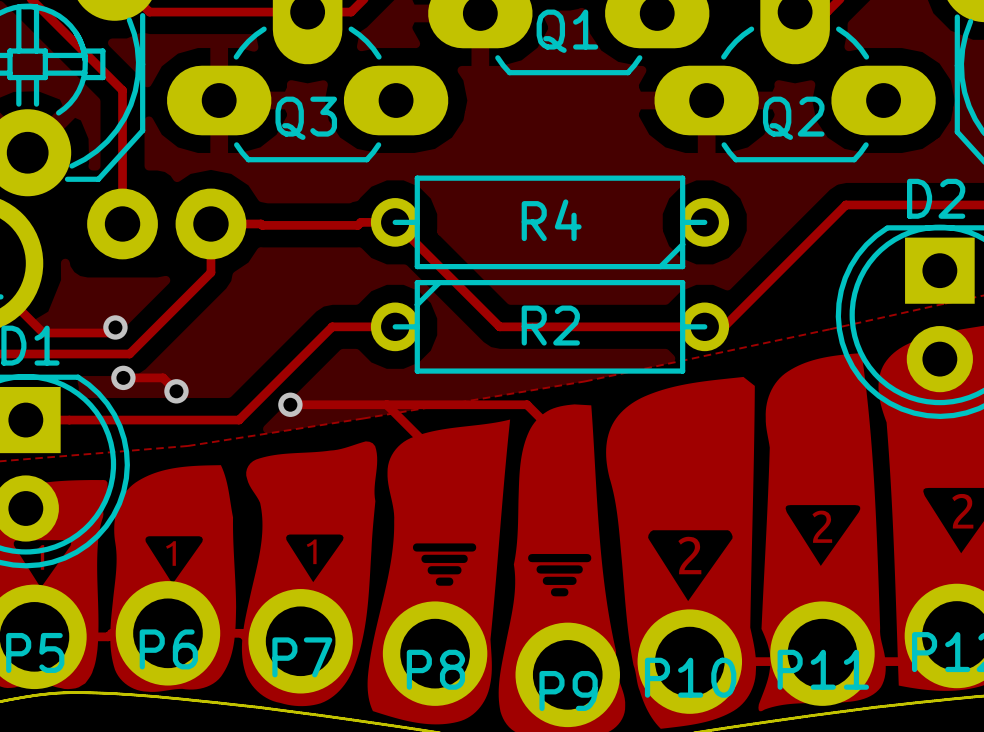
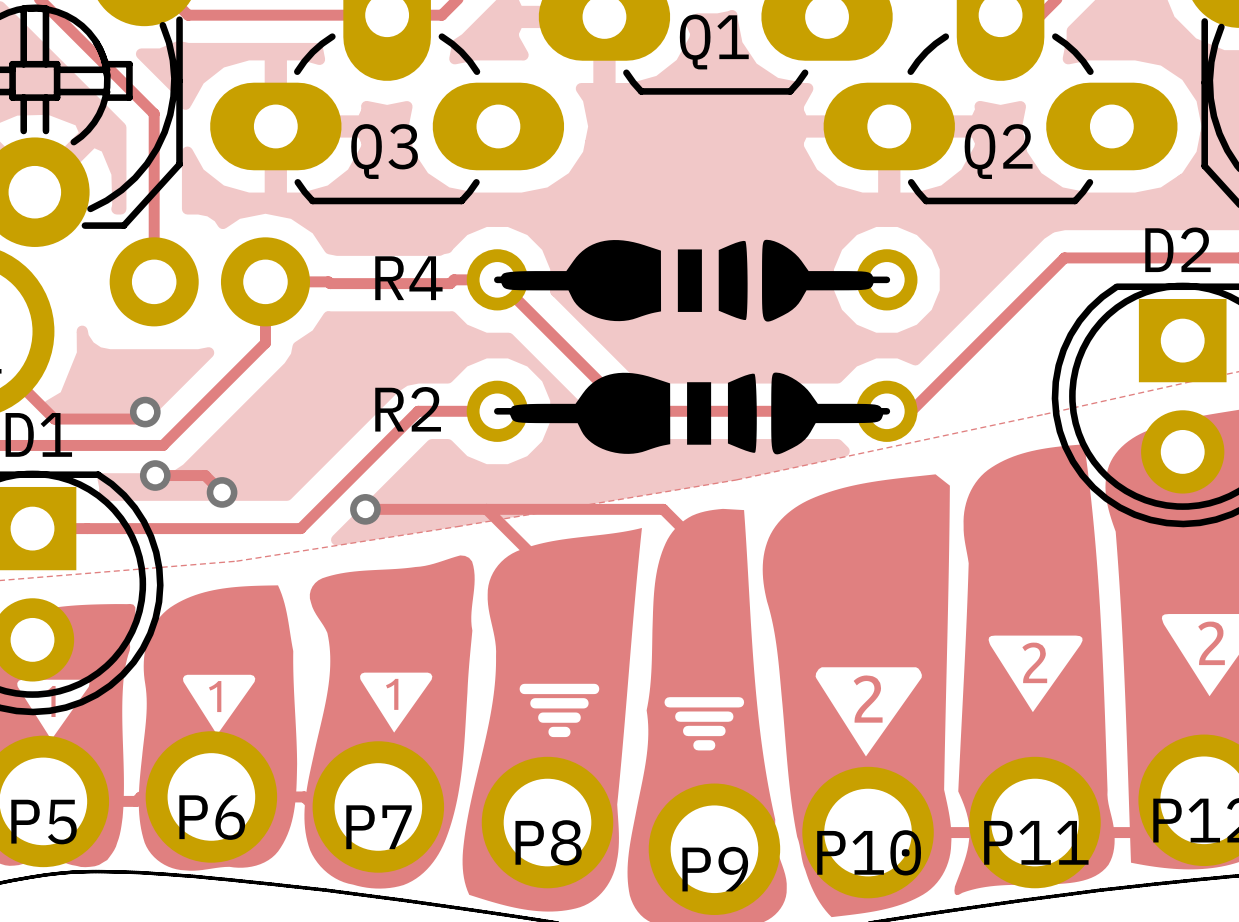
R4 footprint: [370, 175, 730, 270] -> [466, 249, 918, 311]
drawing: none -> [500, 239, 884, 455]
R4 name position: R4 (551, 220) -> R4 (408, 278)
R2 footprint: [370, 280, 730, 374] -> [466, 380, 918, 442]
R2 name position: R2 (550, 325) -> R2 (408, 409)

